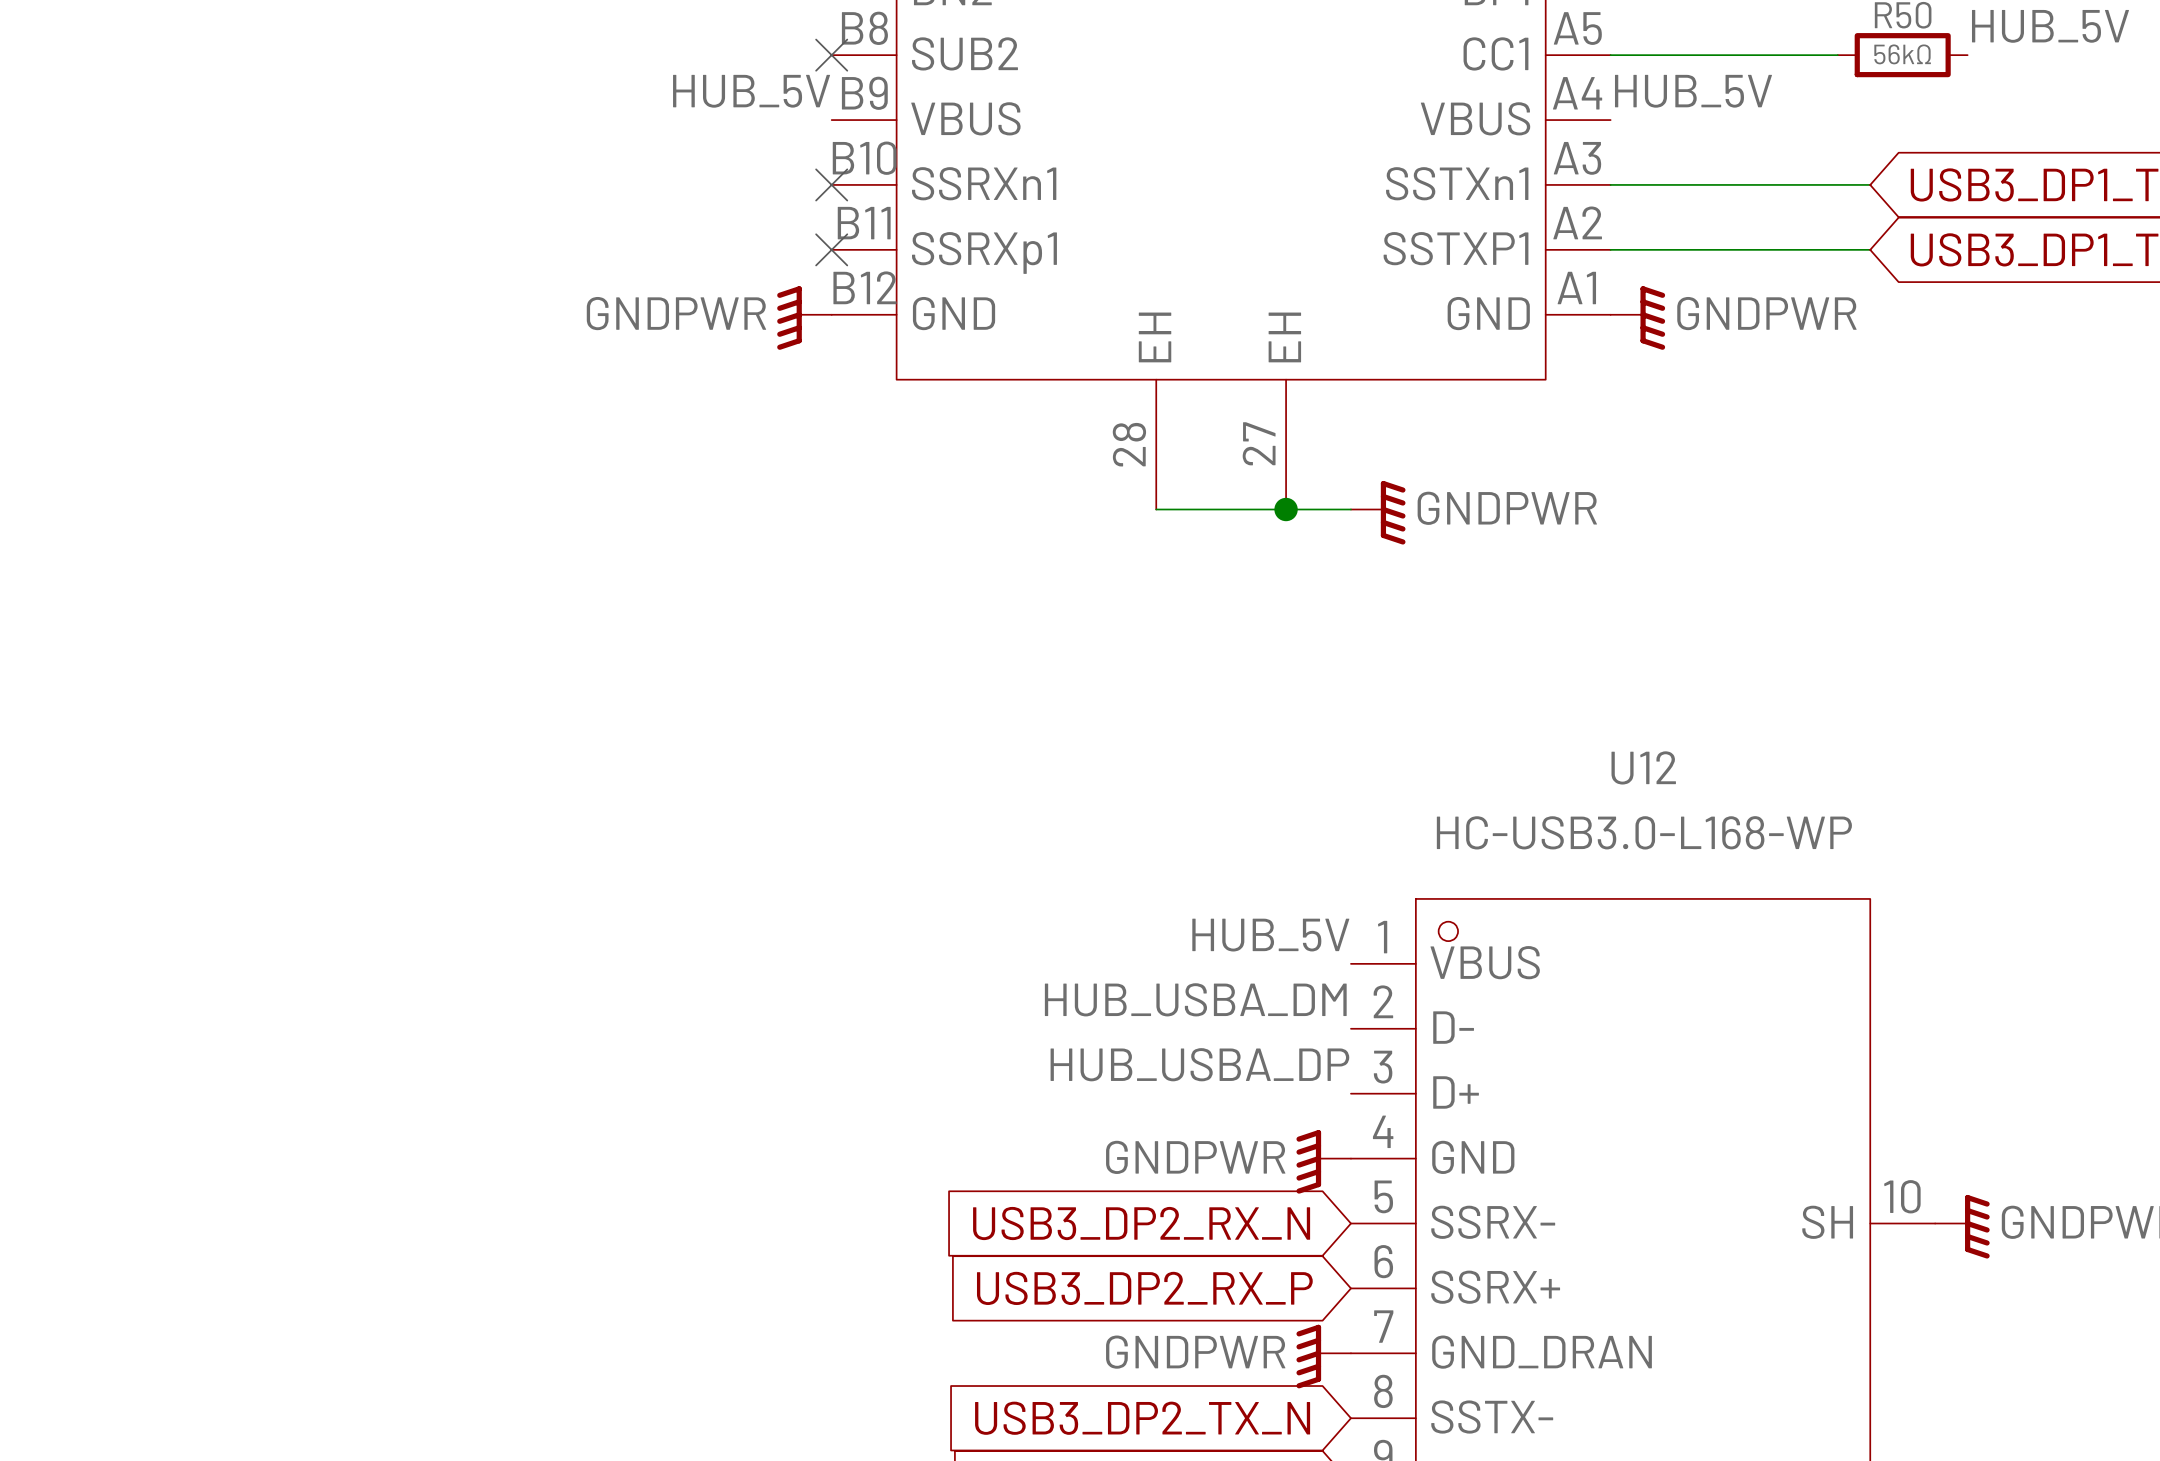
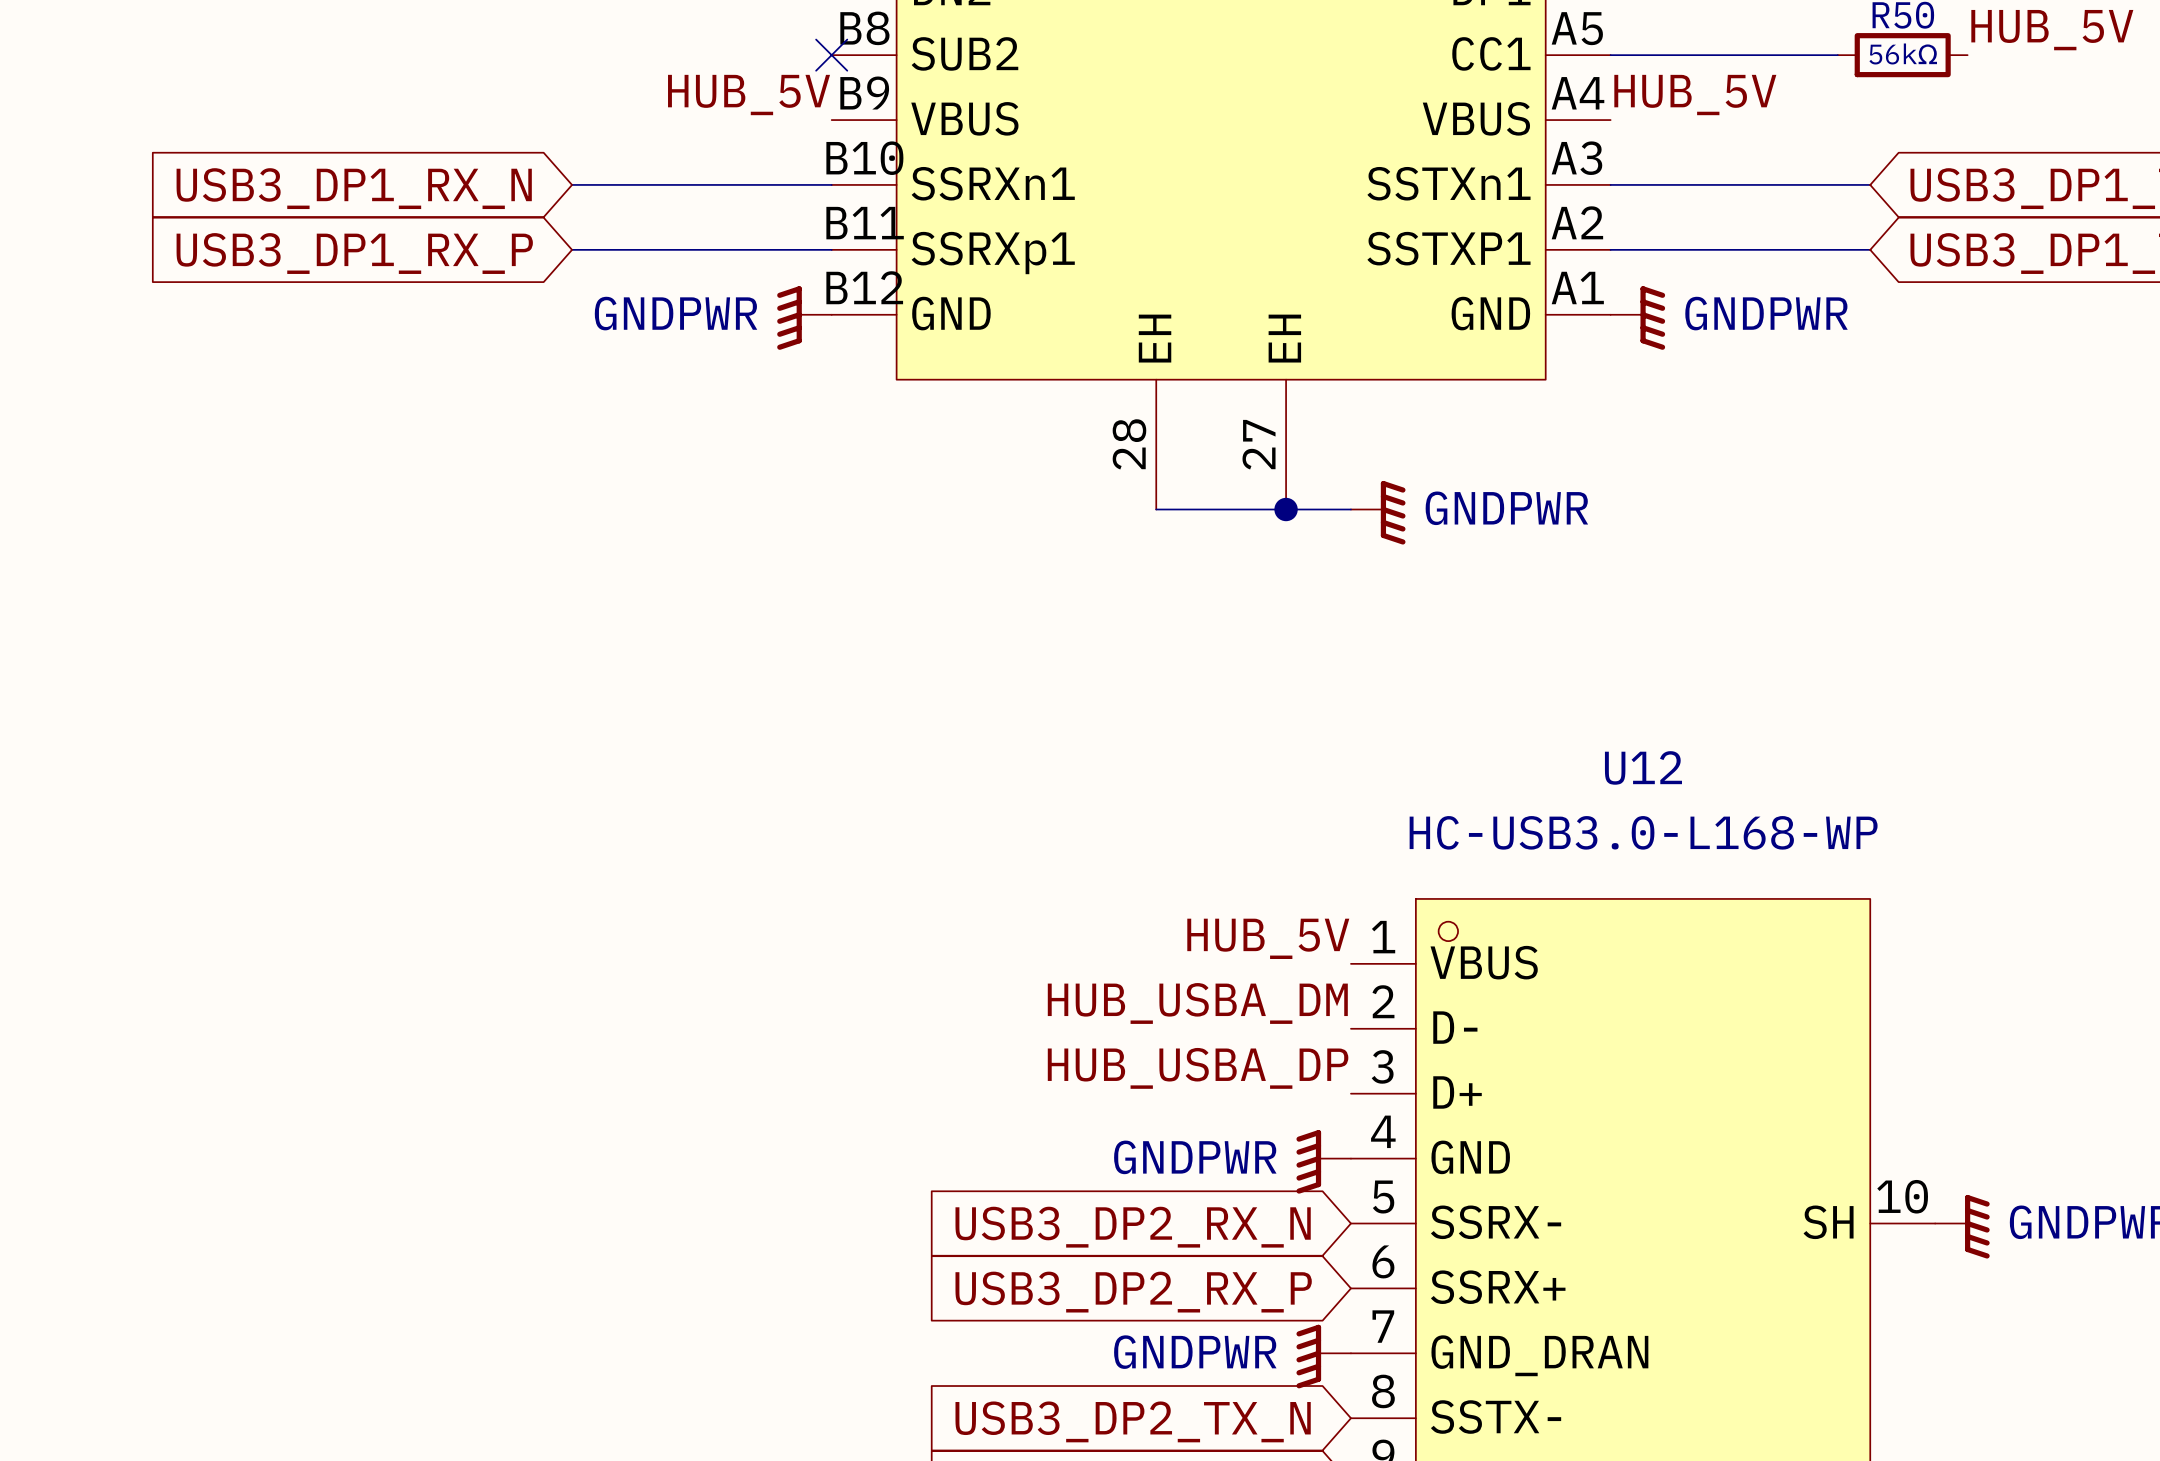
global label: none -> USB3_DP1_RX_N (354, 188)
wire: none -> (572, 184) (831, 184)
no-connect mark: (831, 184) -> none
global label: none -> USB3_DP1_RX_P (354, 253)
wire: none -> (572, 249) (831, 249)
no-connect mark: (831, 249) -> none

